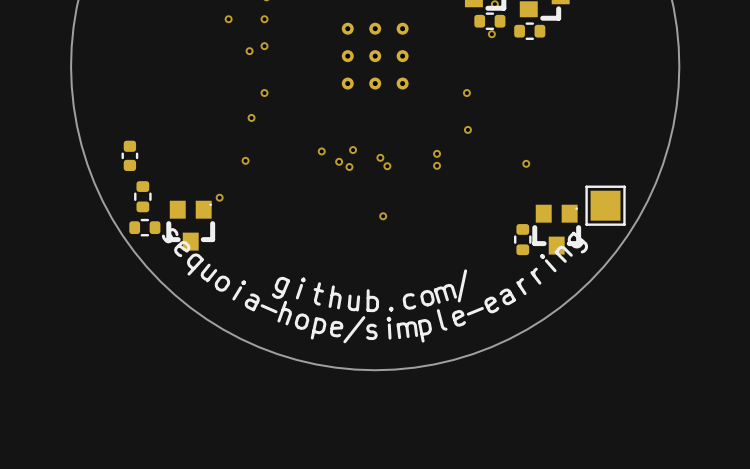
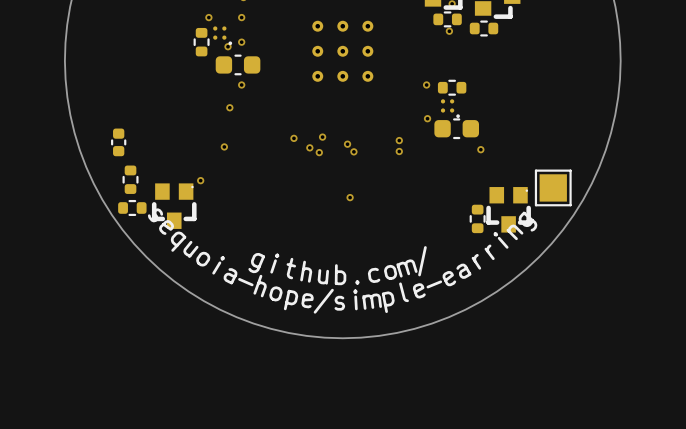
part: none -> (222, 35)
part: none -> (201, 42)
part: none -> (238, 64)
part: none -> (452, 87)
part: none -> (450, 108)
part: none -> (456, 128)

